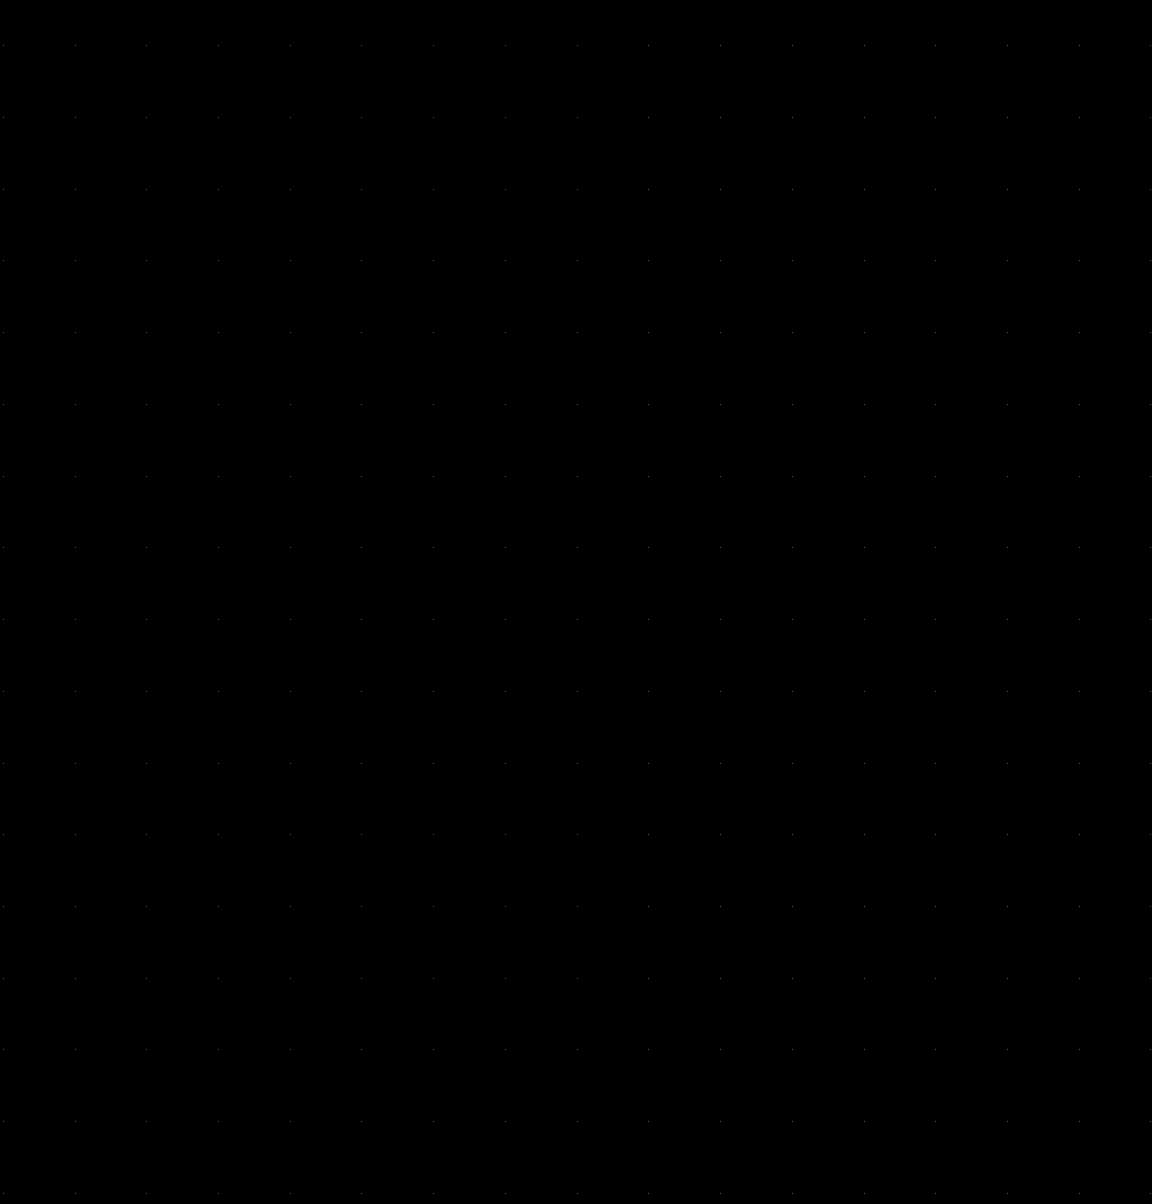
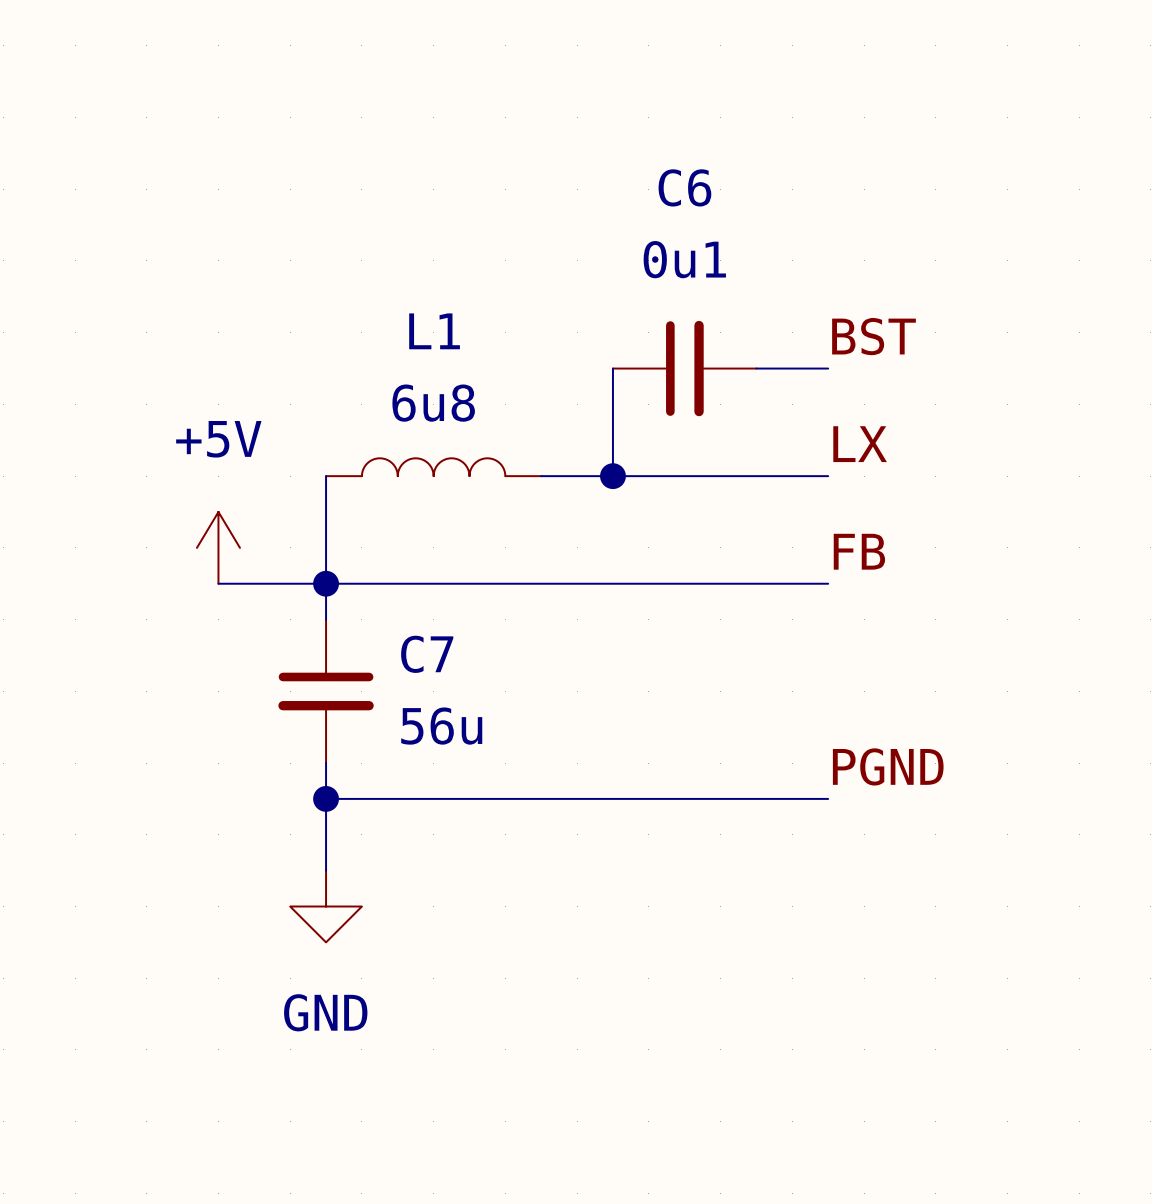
label: none -> BST (874, 336)
wire: none -> (612, 368) (612, 476)
C6: none -> 0u1 (684, 368)
wire: none -> (756, 368) (828, 368)
label: none -> LX (860, 444)
L1: none -> 6u8 (433, 467)
wire: none -> (326, 476) (326, 619)
wire: none -> (541, 476) (828, 476)
junction: none -> (612, 476)
power symbol: none -> +5V (218, 547)
label: none -> FB (859, 551)
wire: none -> (218, 583) (828, 583)
junction: none -> (326, 583)
C7: none -> 56u (326, 691)
wire: none -> (326, 763) (326, 870)
label: none -> PGND (888, 766)
wire: none -> (326, 798) (828, 798)
junction: none -> (326, 798)
power symbol: none -> GND (326, 906)

